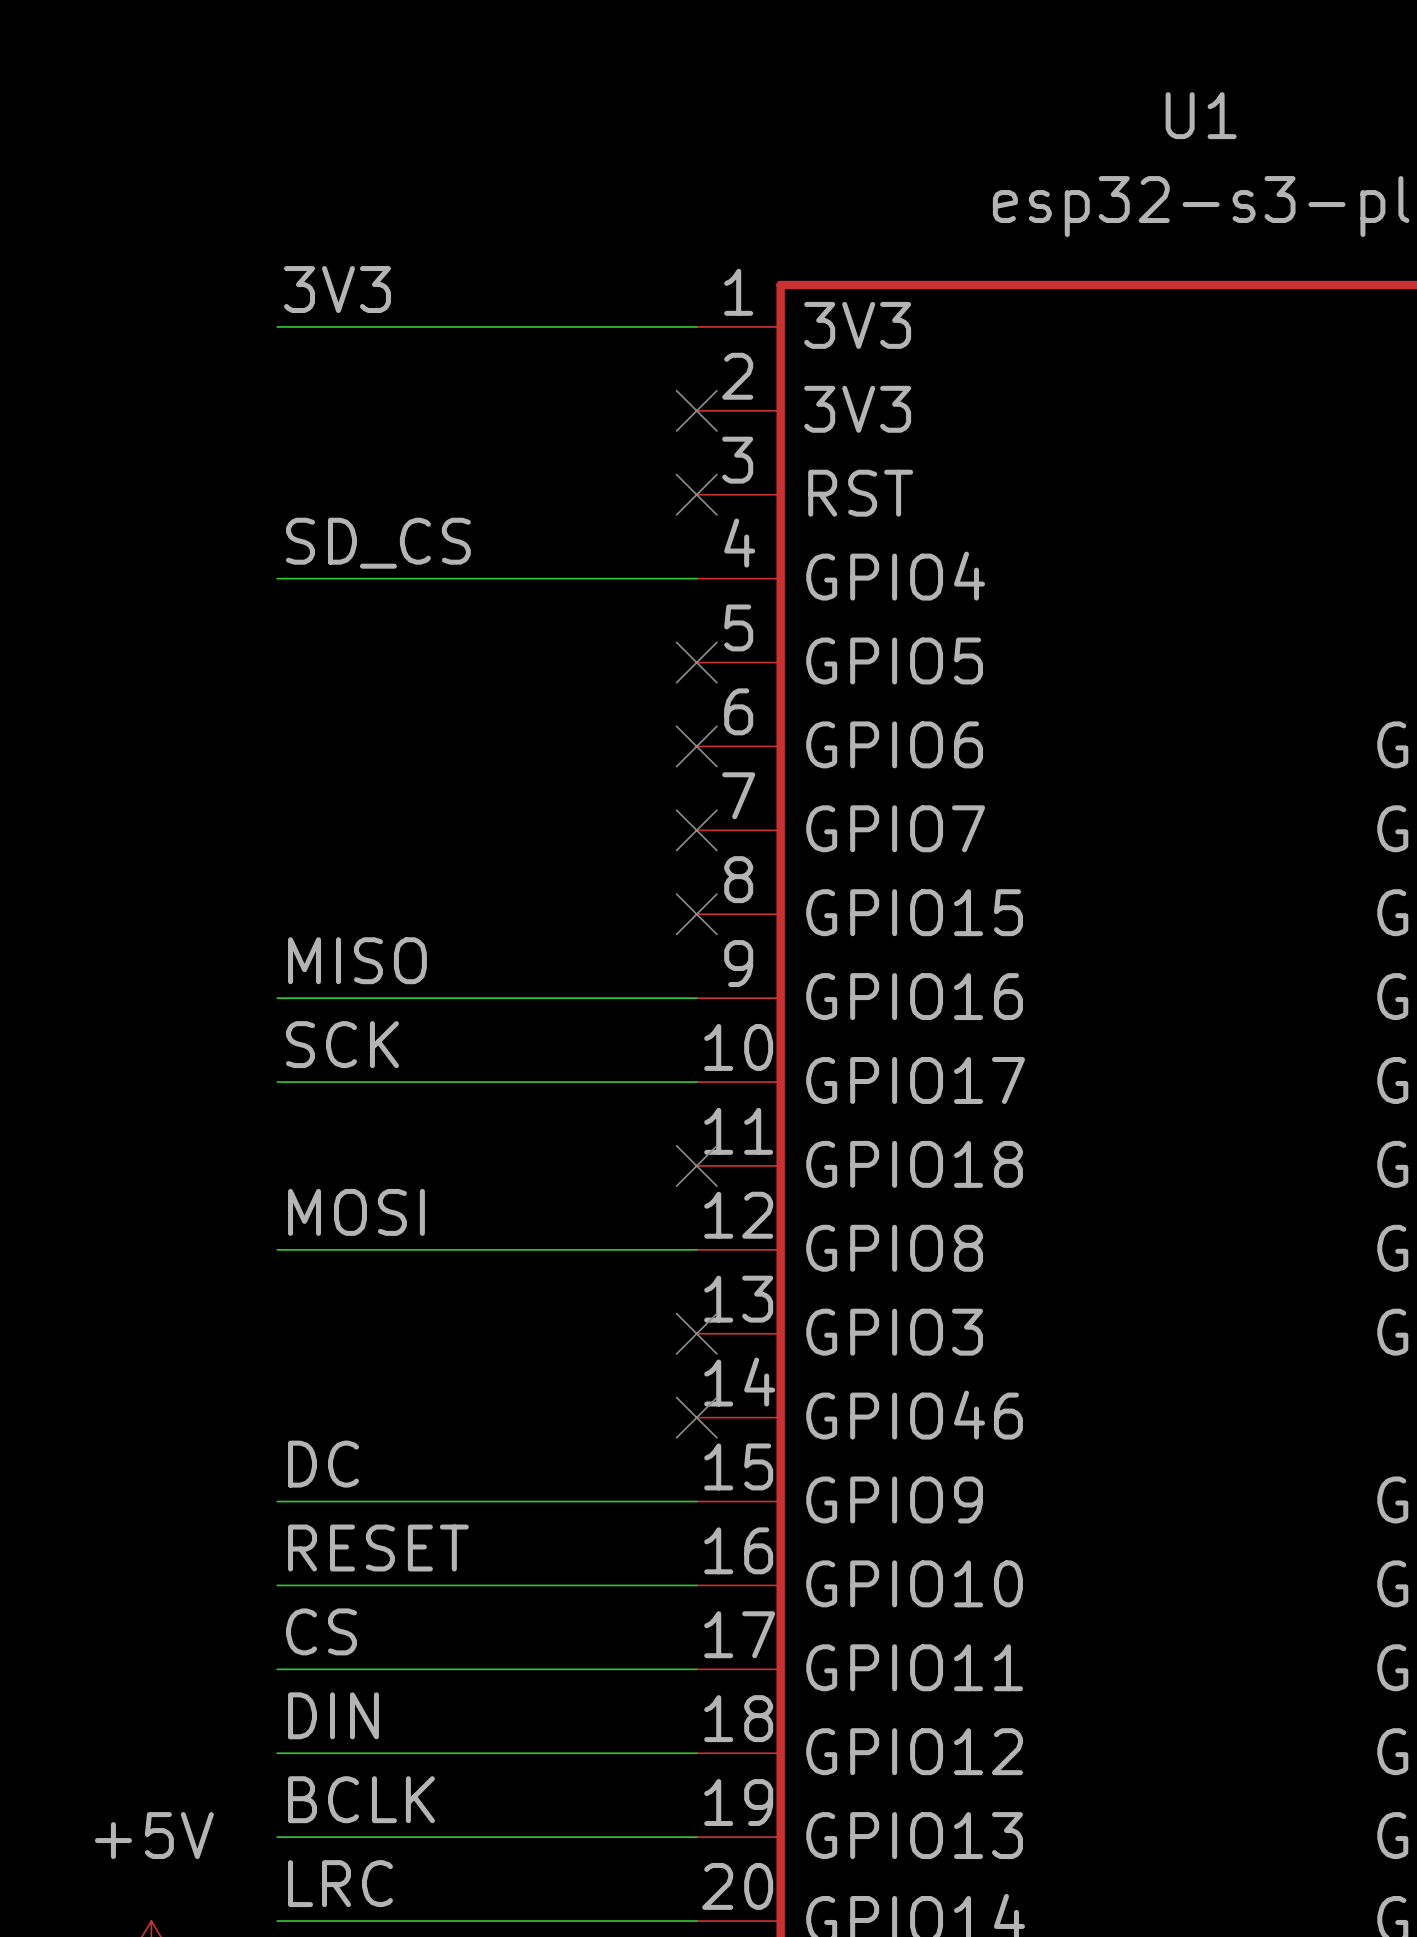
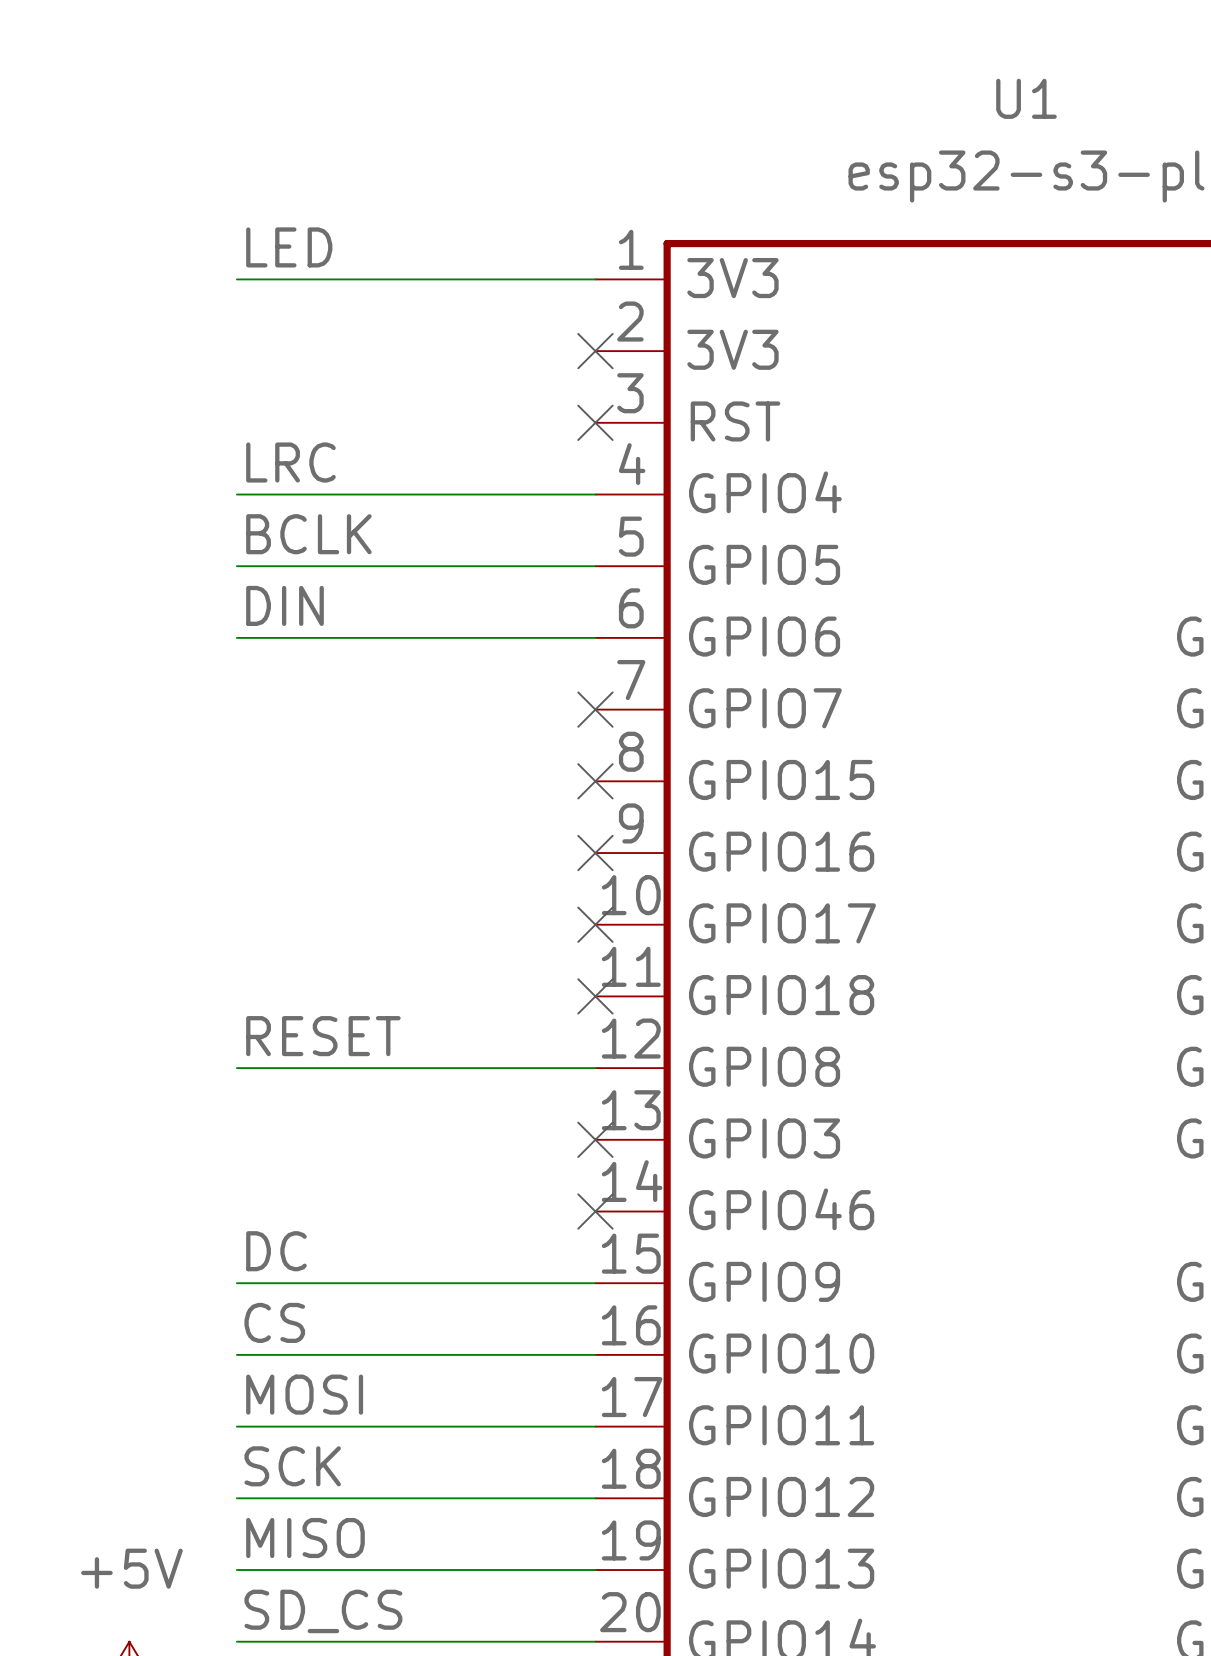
label: 3V3 (337, 289) -> LED (289, 247)
label: SD_CS (378, 543) -> LRC (290, 462)
label: none -> BCLK (308, 534)
no-connect mark: (696, 662) -> none
label: none -> DIN (285, 605)
no-connect mark: (696, 746) -> none
label: MISO (357, 960) -> none
wire: (277, 998) (696, 998) -> (236, 566) (595, 566)
no-connect mark: none -> (595, 853)
label: SCK (342, 1044) -> none
wire: (277, 1082) (696, 1082) -> (236, 637) (595, 637)
no-connect mark: none -> (595, 924)
label: MOSI (356, 1212) -> RESET (323, 1036)
label: RESET (378, 1548) -> CS (274, 1322)
label: CS (321, 1631) -> MOSI (304, 1394)
label: DIN (333, 1715) -> SCK (292, 1466)
label: BCLK (361, 1799) -> MISO (305, 1538)
label: LRC (340, 1883) -> SD_CS (323, 1611)

